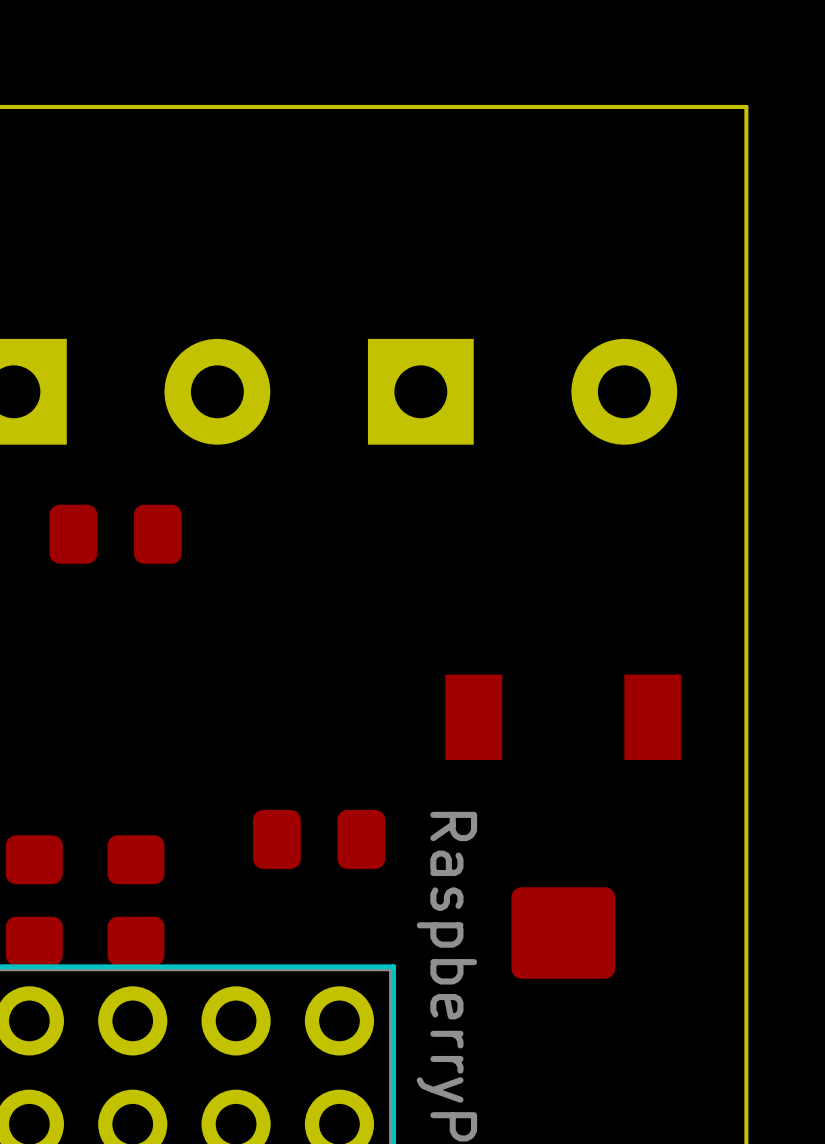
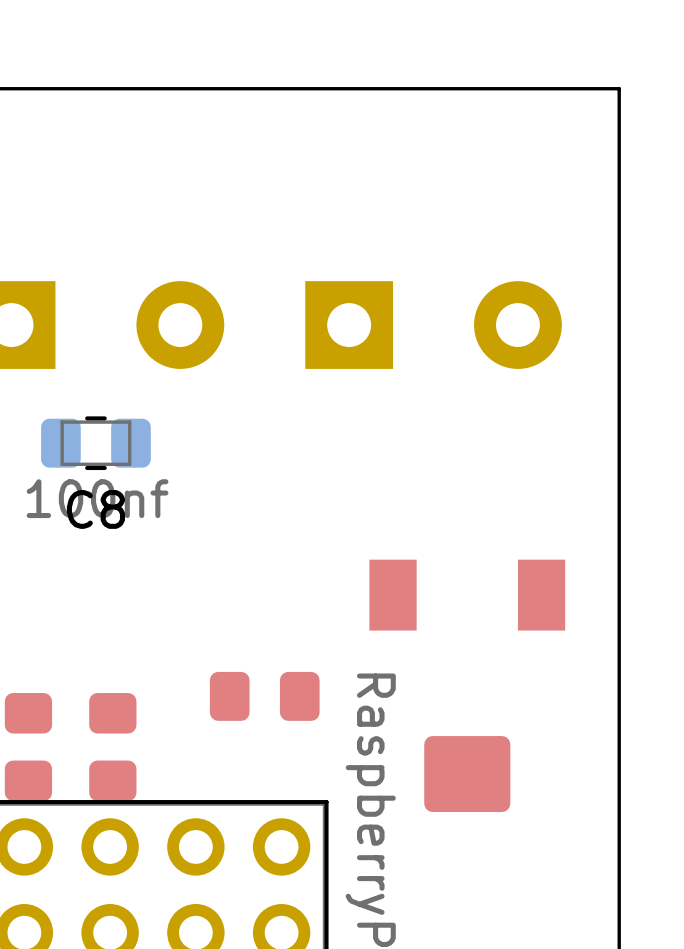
C8 side: top (115, 534) -> bottom (95, 443)

